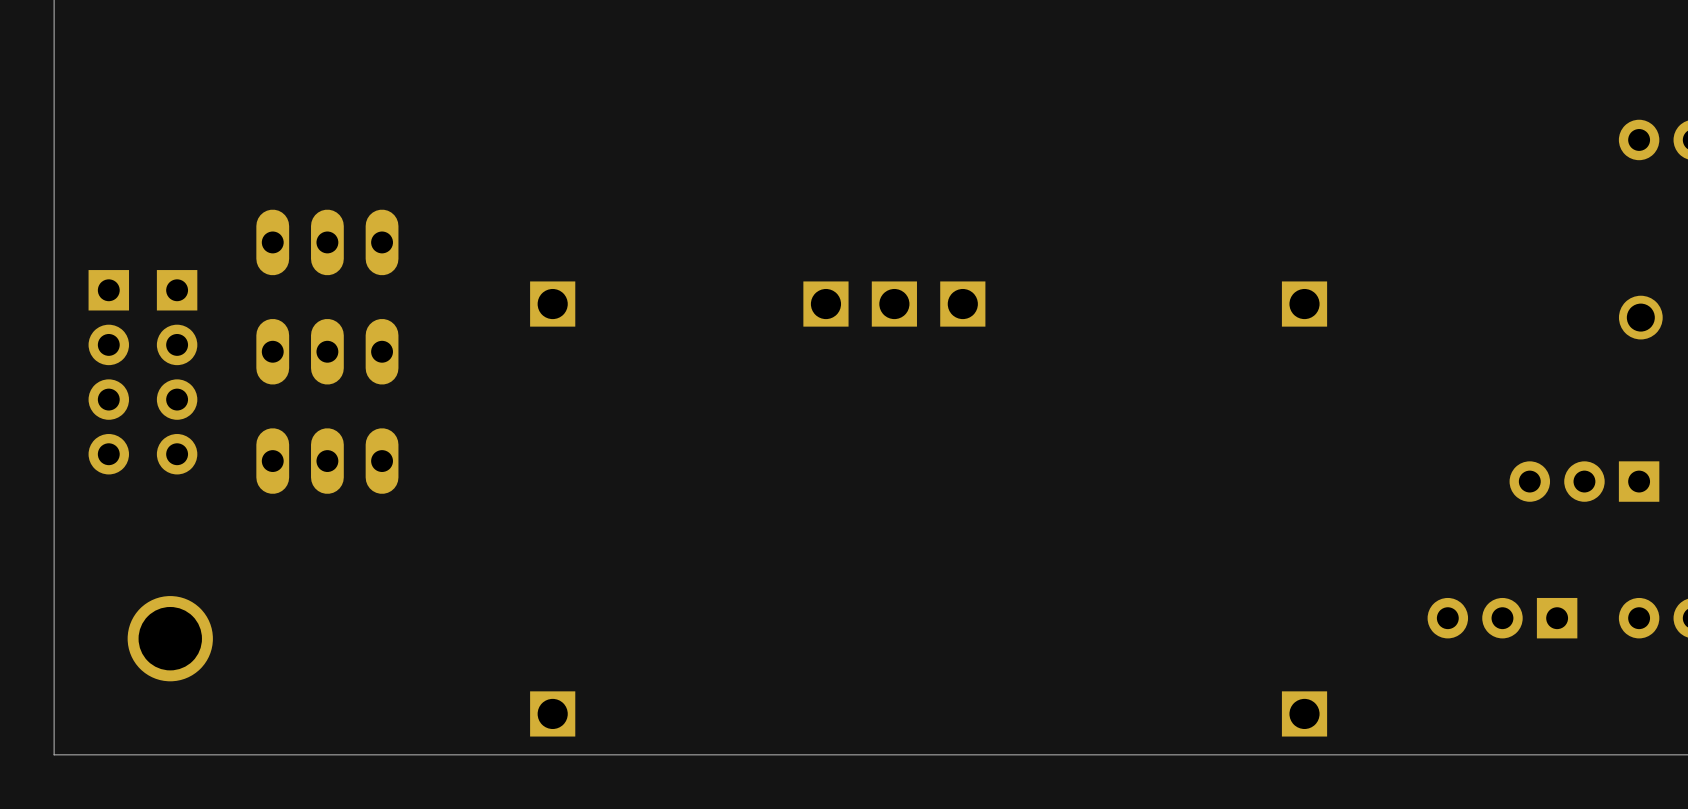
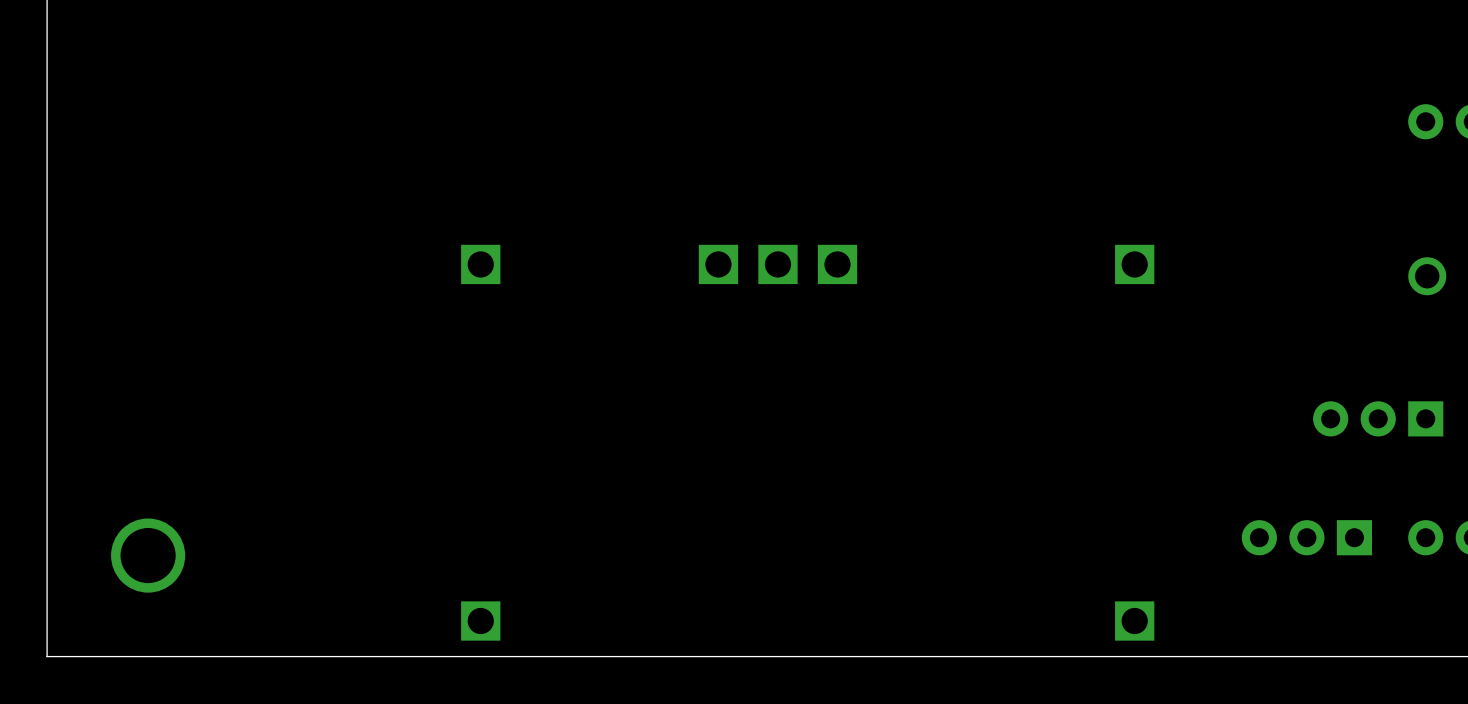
part: (327, 242) -> none
part: (327, 351) -> none
part: (108, 372) -> none
part: (177, 372) -> none
part: (327, 461) -> none

